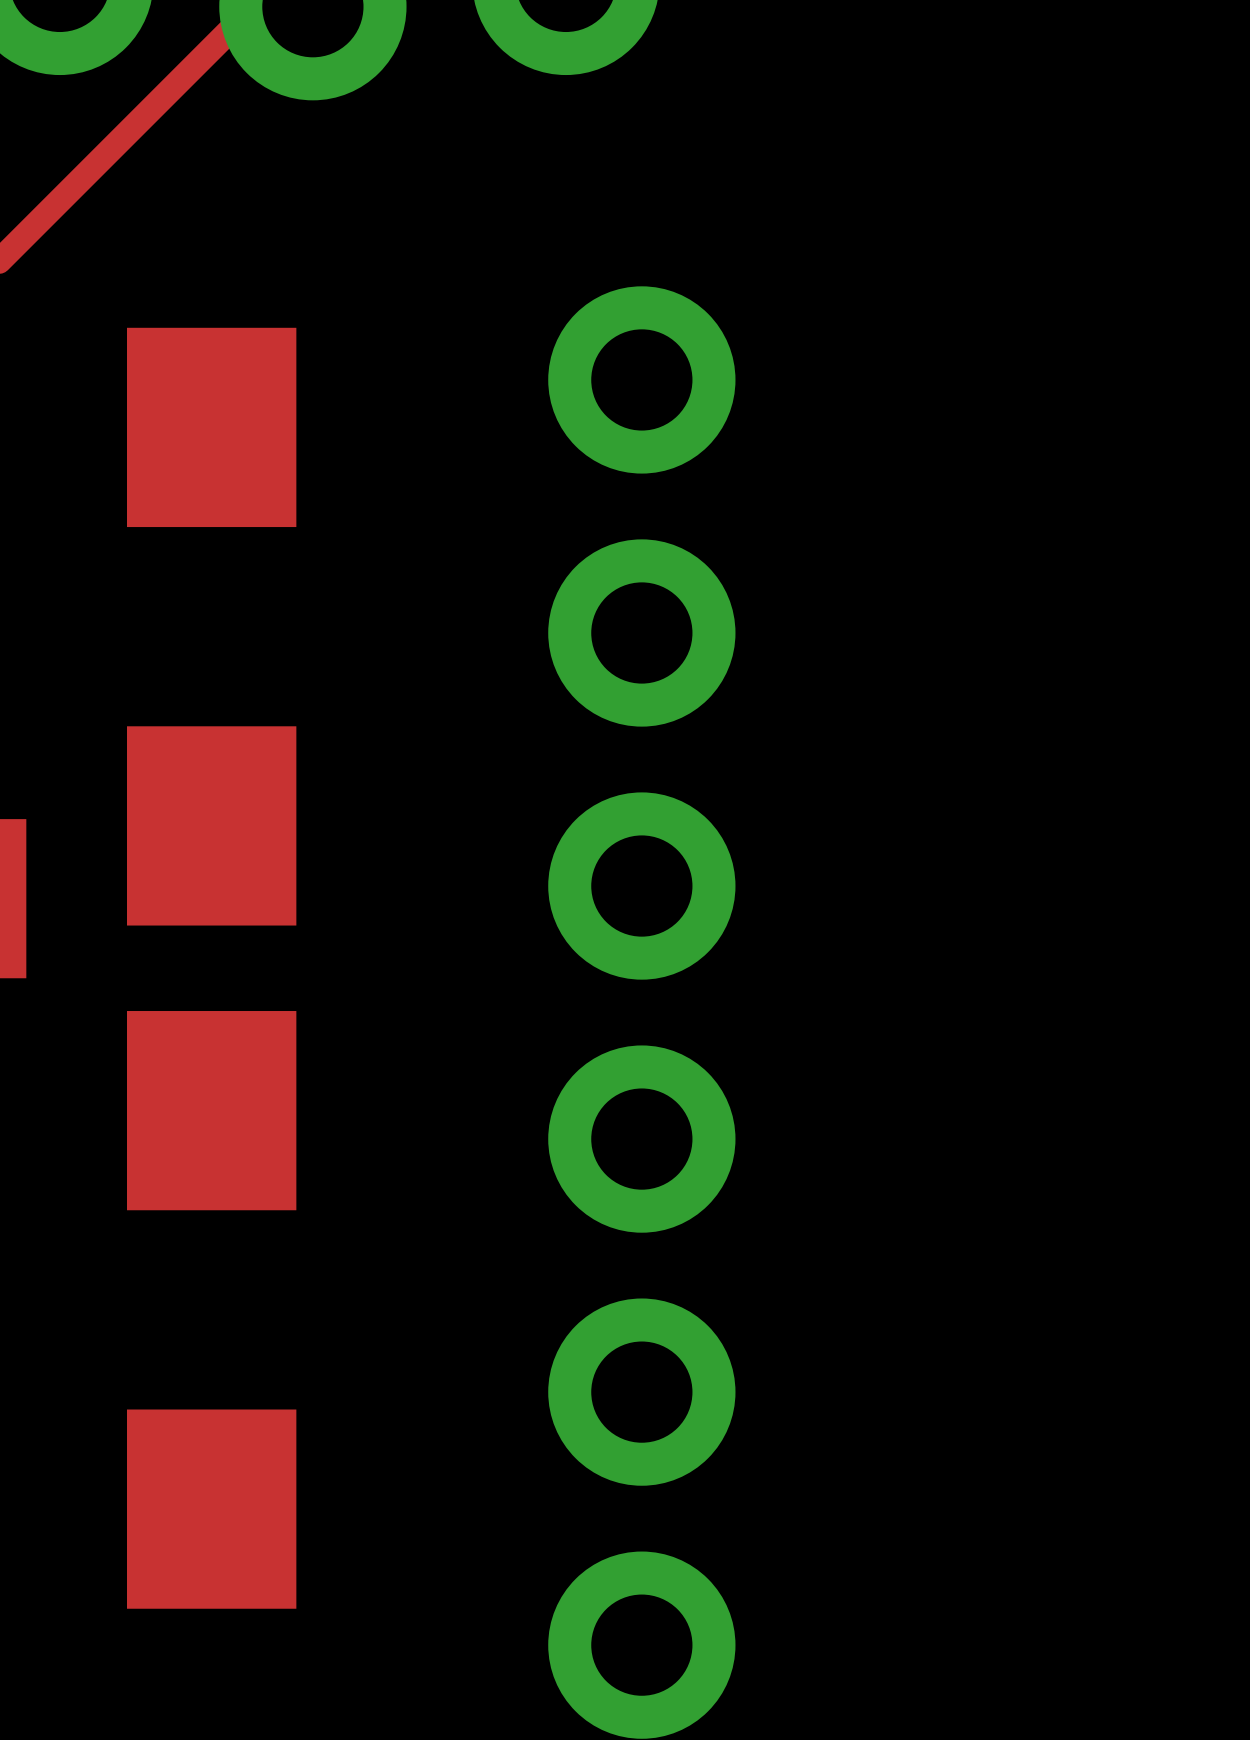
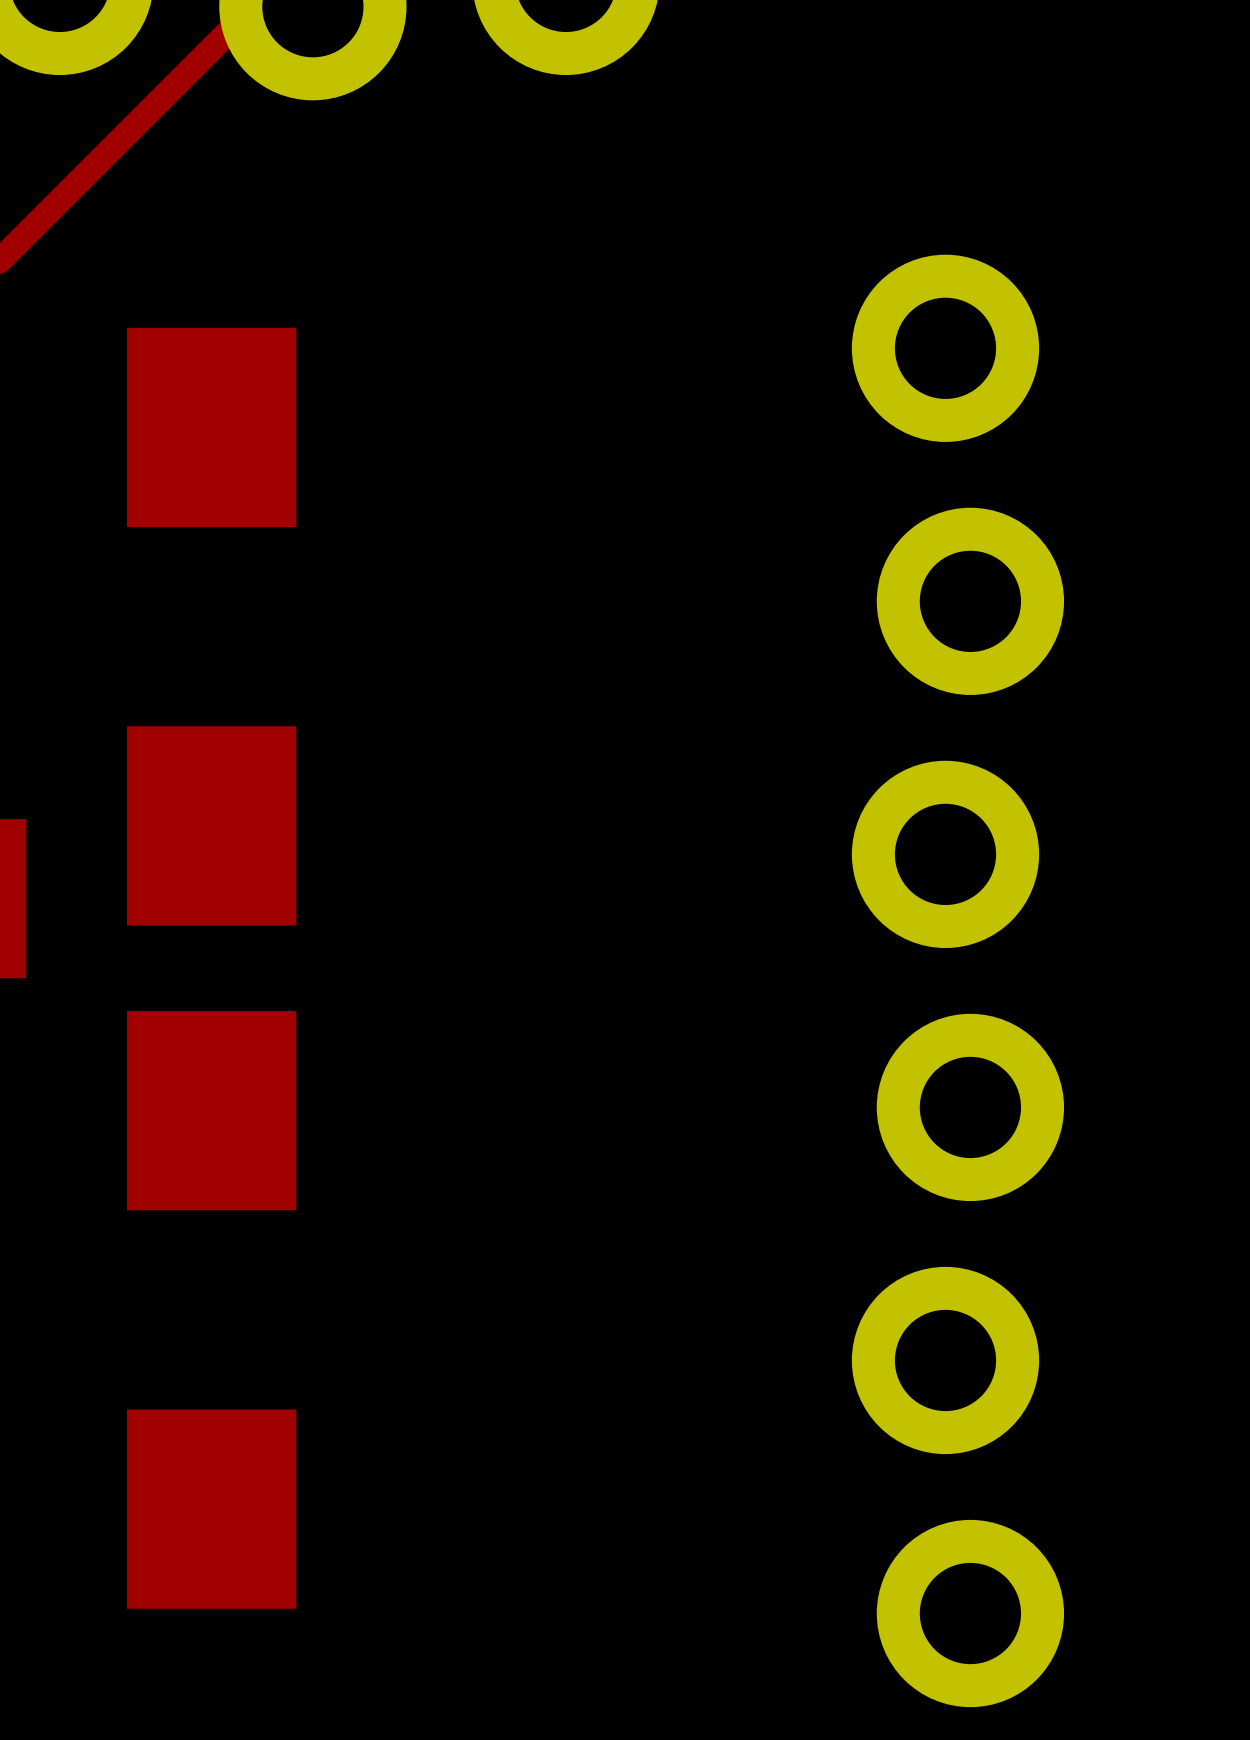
part: none -> (957, 980)
part: (641, 1012) -> none

